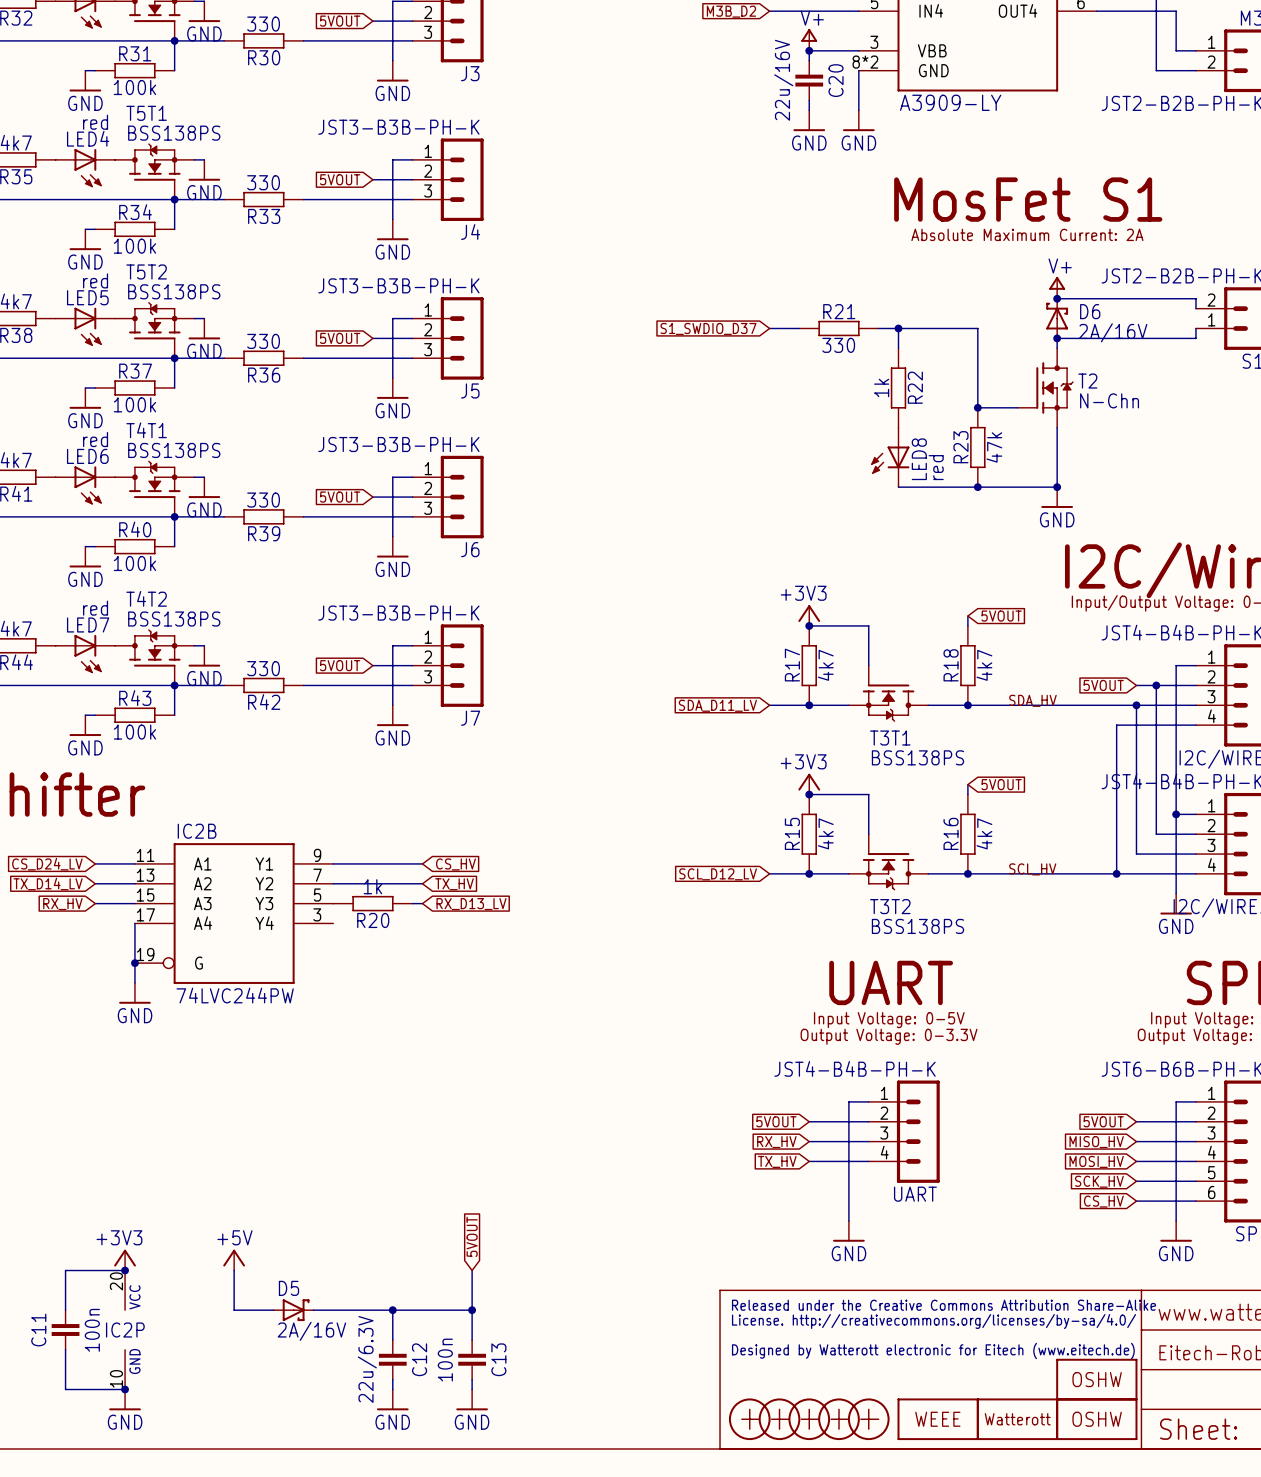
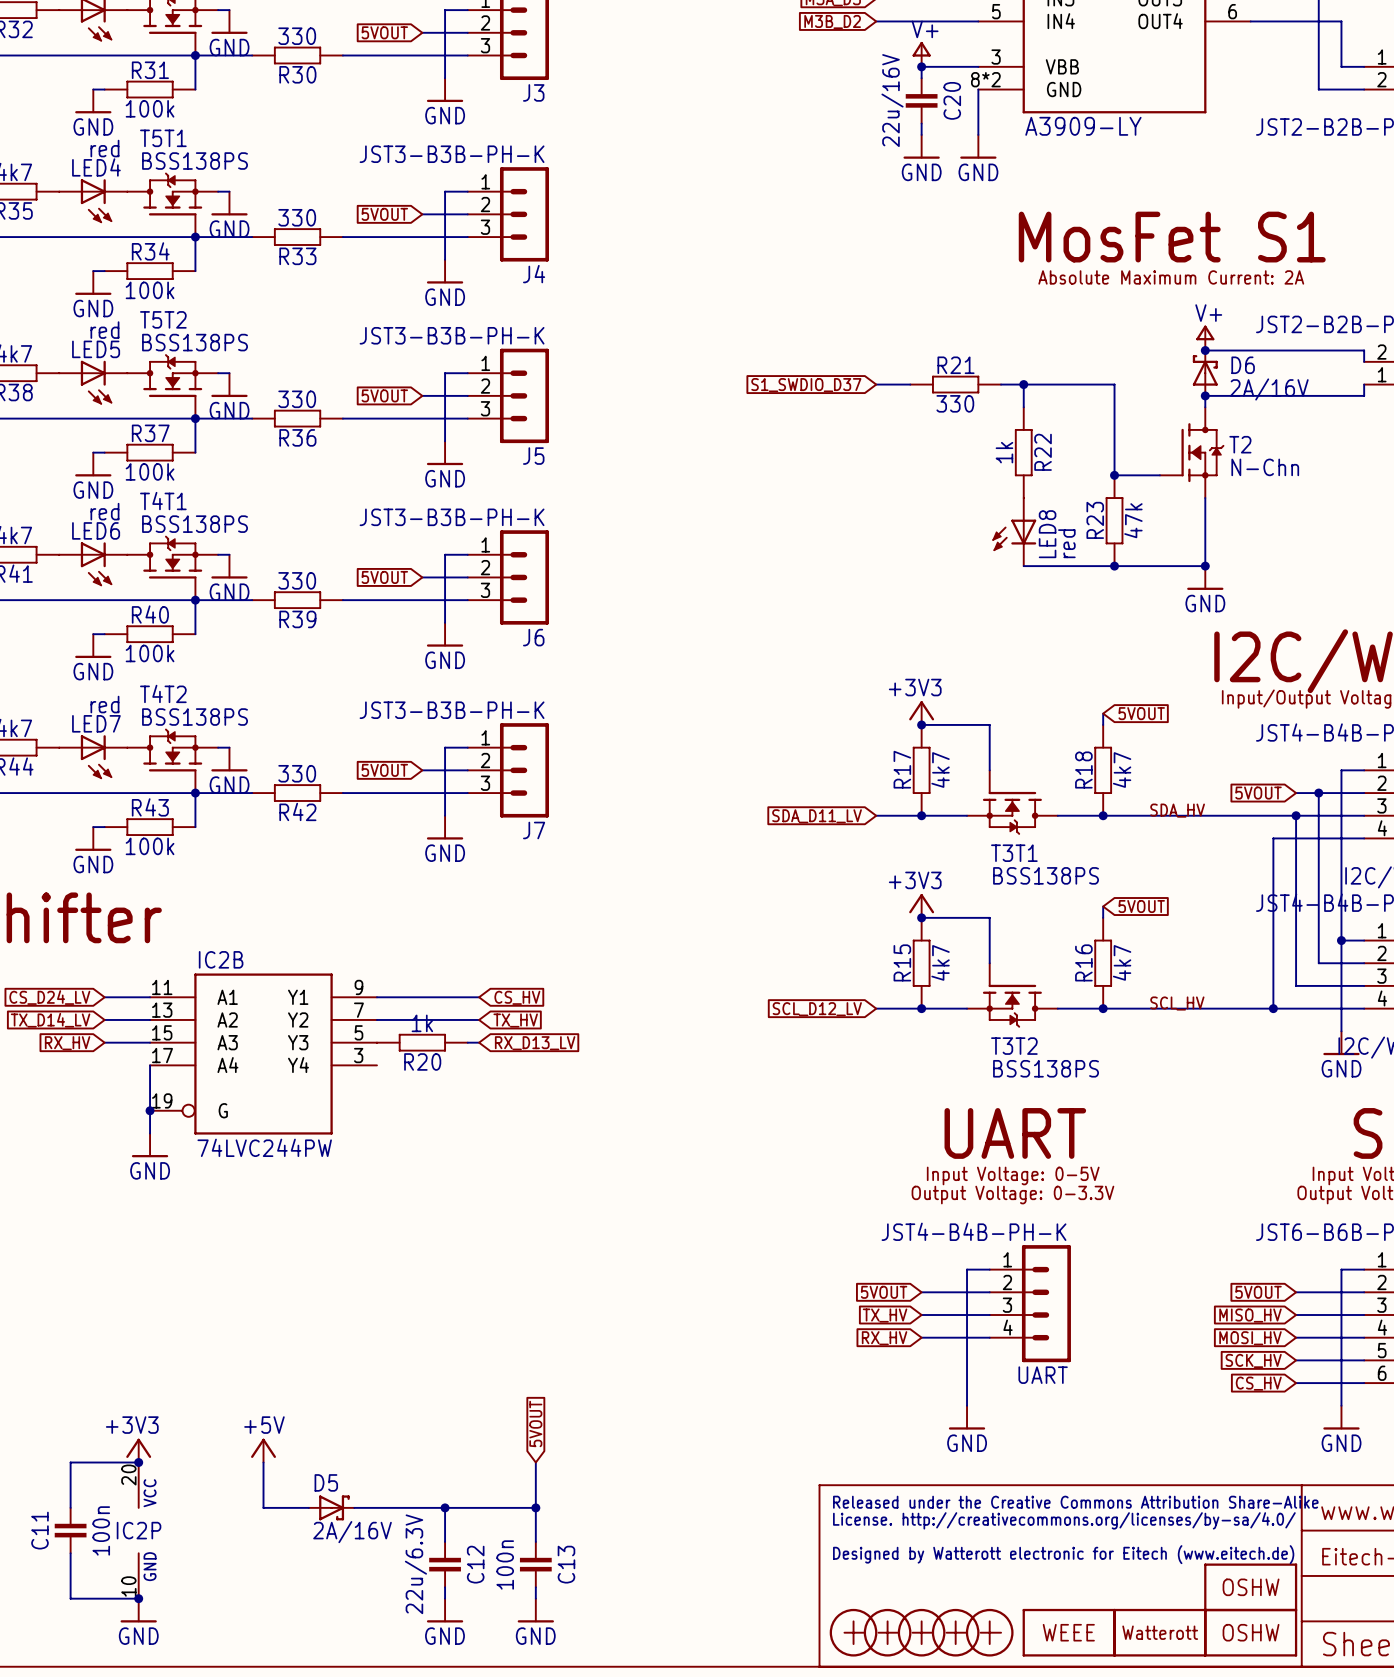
global label: RX_HV (776, 1142) -> TX_HV (885, 1315)
global label: TX_HV (777, 1161) -> RX_HV (884, 1338)

